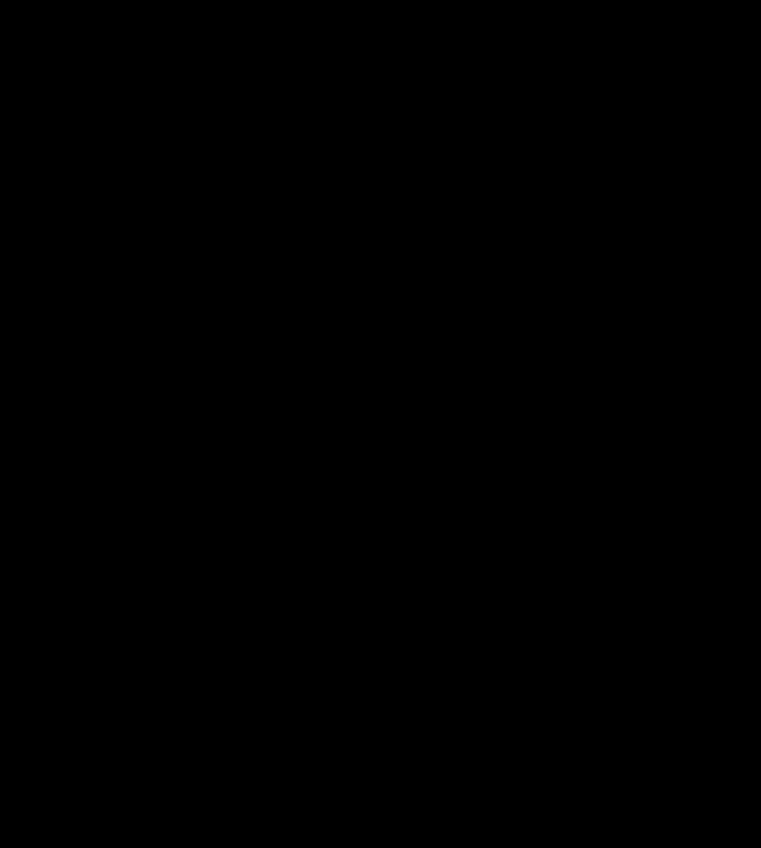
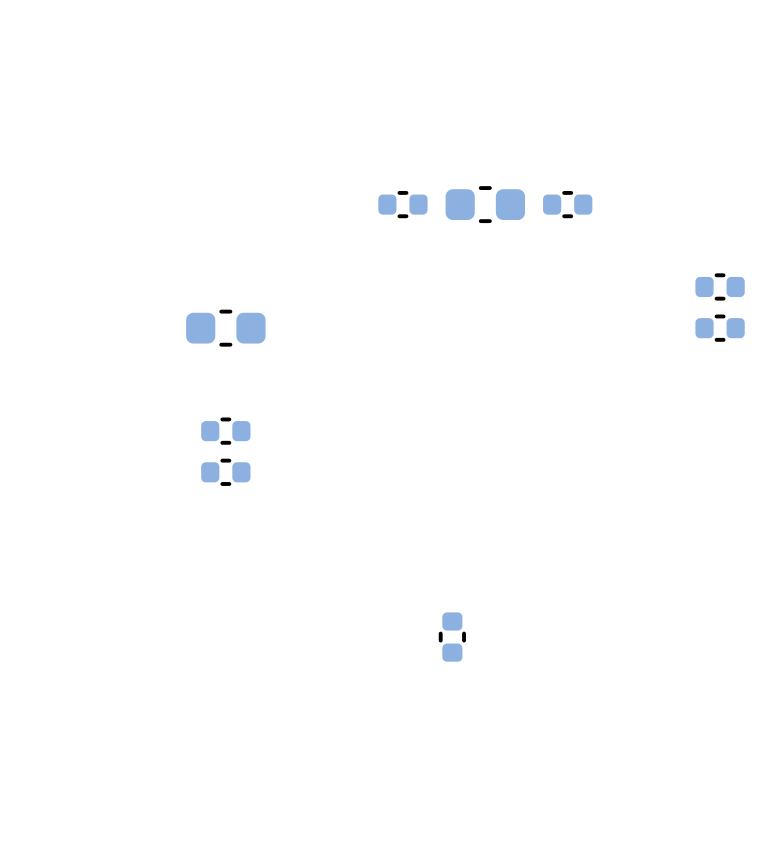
part: none -> (402, 204)
part: none -> (485, 204)
part: none -> (567, 204)
part: none -> (720, 286)
part: none -> (225, 328)
part: none -> (720, 328)
part: none -> (225, 431)
part: none -> (225, 472)
part: none -> (452, 637)

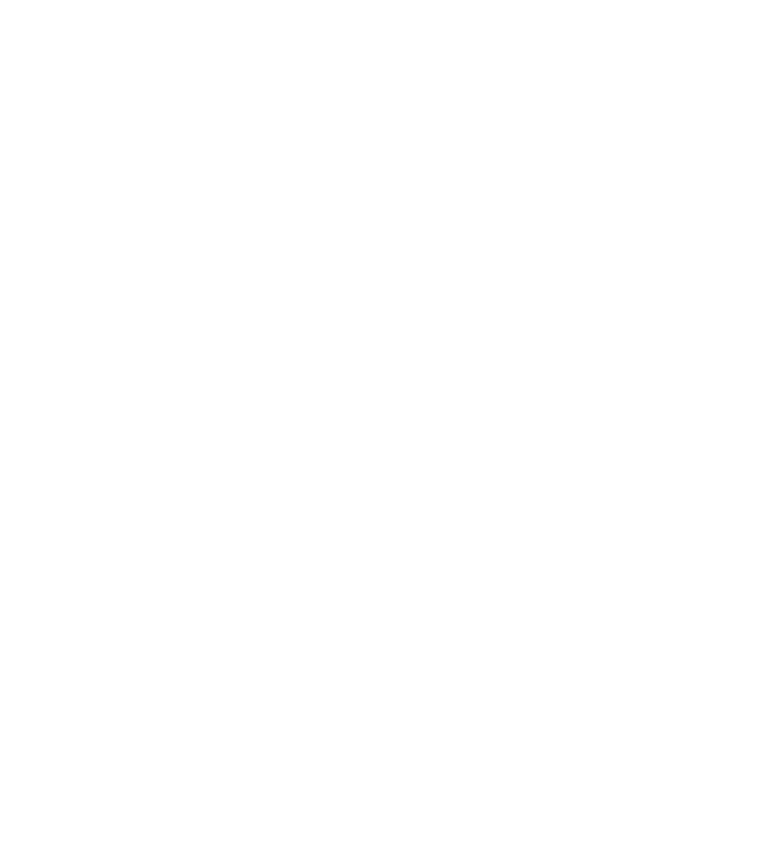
part: (402, 204) -> none
part: (485, 204) -> none
part: (567, 204) -> none
part: (720, 286) -> none
part: (225, 328) -> none
part: (720, 328) -> none
part: (225, 431) -> none
part: (225, 472) -> none
part: (452, 637) -> none

